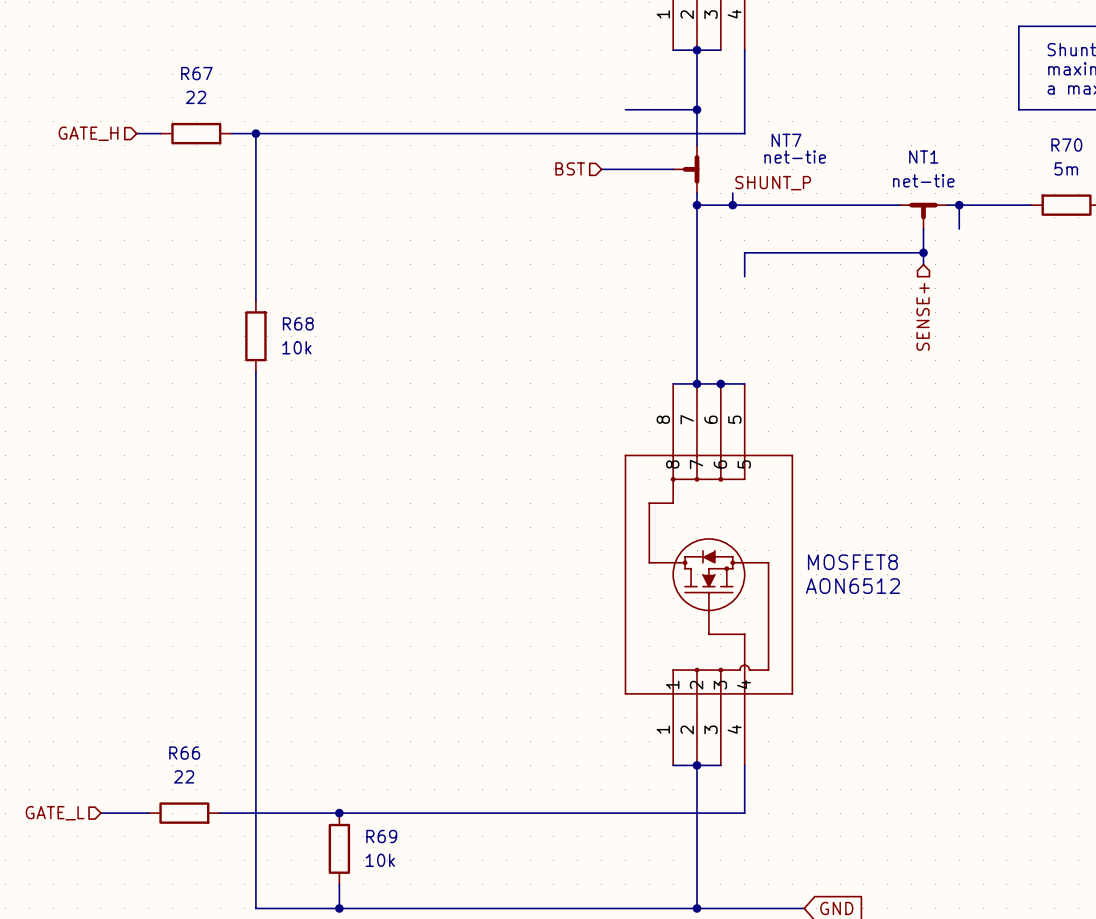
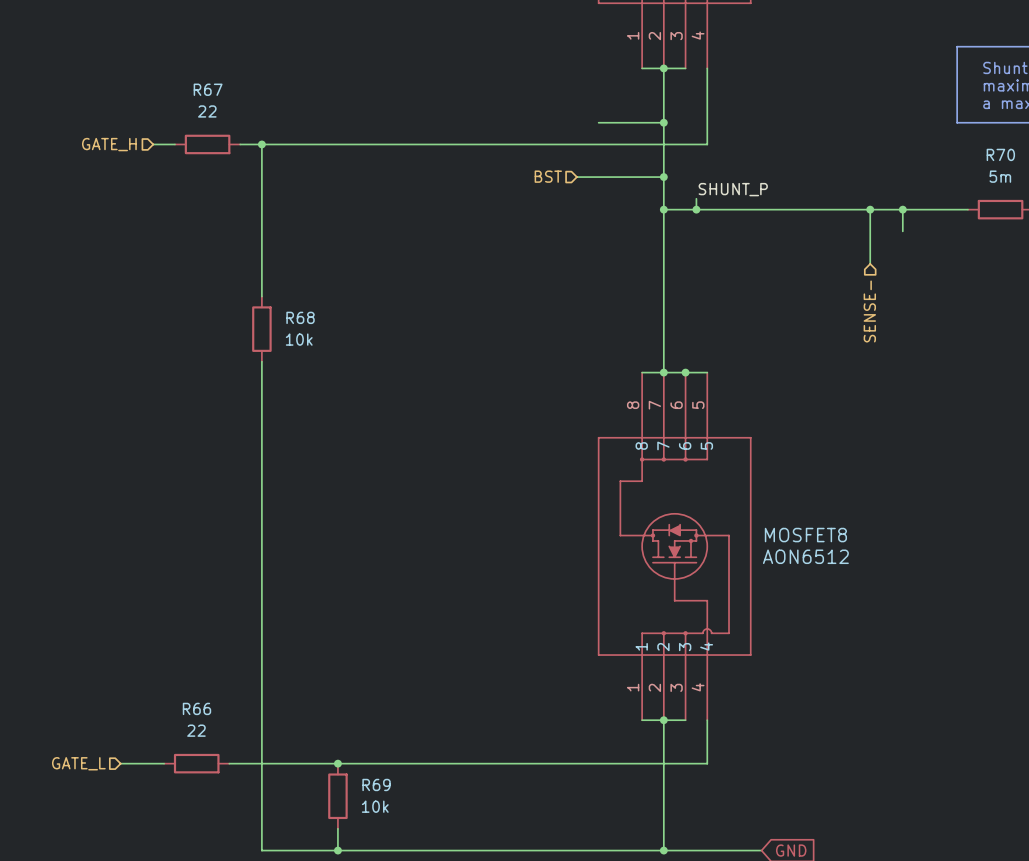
NT7: net-tie (685, 169) -> none
junction: none -> (663, 177)
NT1: net-tie (923, 216) -> none
wire: (923, 252) (744, 252) (744, 276) -> none
junction position: (923, 252) -> (870, 209)
hierarchical label: SENSE+ (923, 316) -> SENSE- (869, 311)

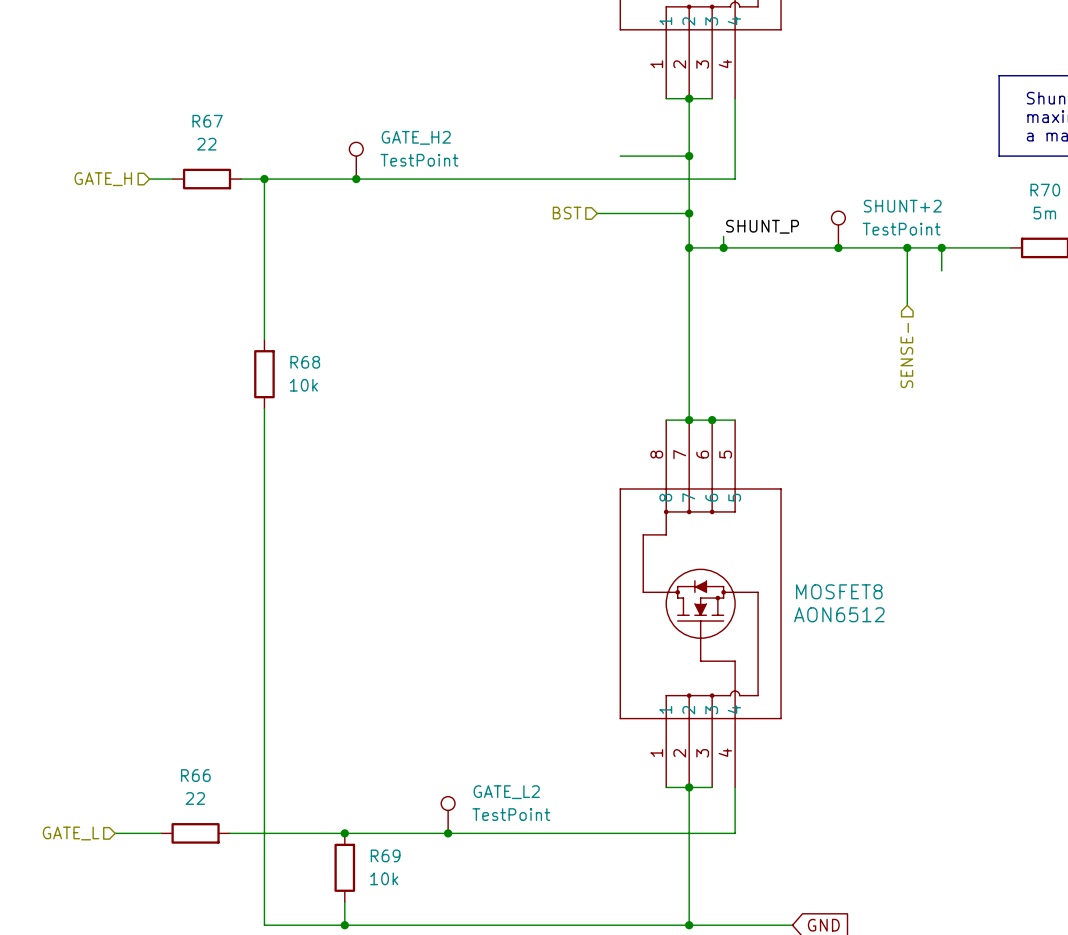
GATE_H2: none -> TestPoint (356, 160)
junction: none -> (356, 179)
SHUNT+2: none -> TestPoint (838, 229)
junction: none -> (838, 247)
GATE_L2: none -> TestPoint (448, 815)
junction: none -> (448, 833)

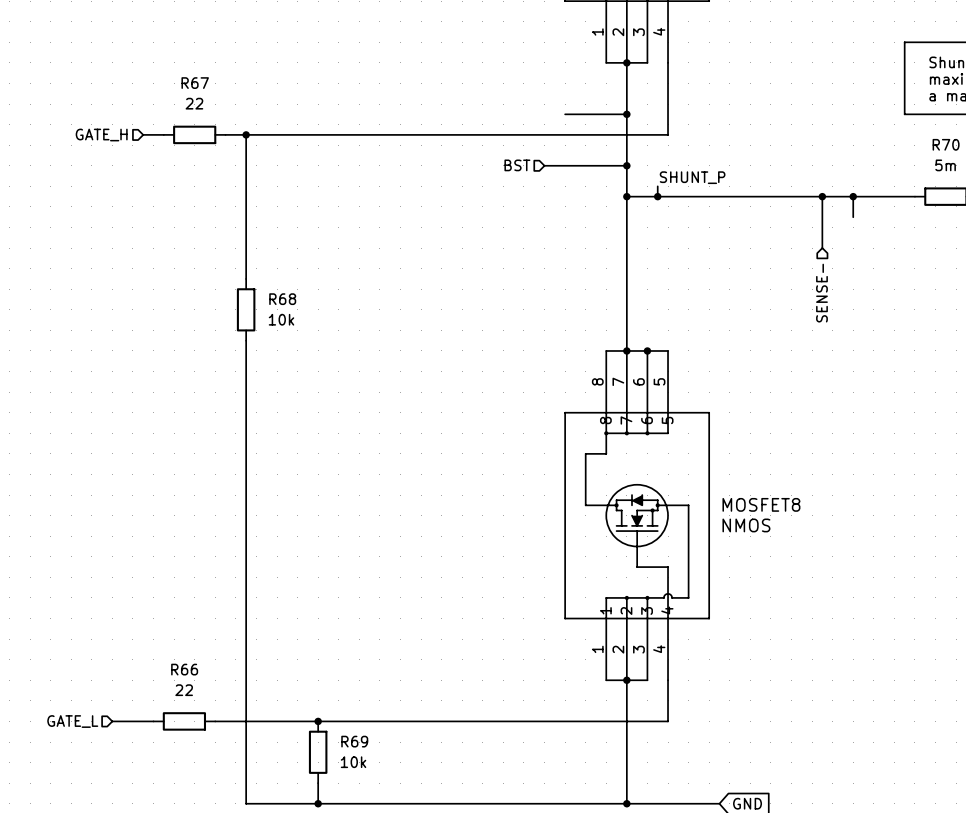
GATE_H2: TestPoint (356, 160) -> none
junction: (356, 179) -> none
SHUNT+2: TestPoint (838, 229) -> none
junction: (838, 247) -> none
MOSFET8 value: AON6512 (839, 614) -> NMOS (746, 525)
GATE_L2: TestPoint (448, 815) -> none
junction: (448, 833) -> none

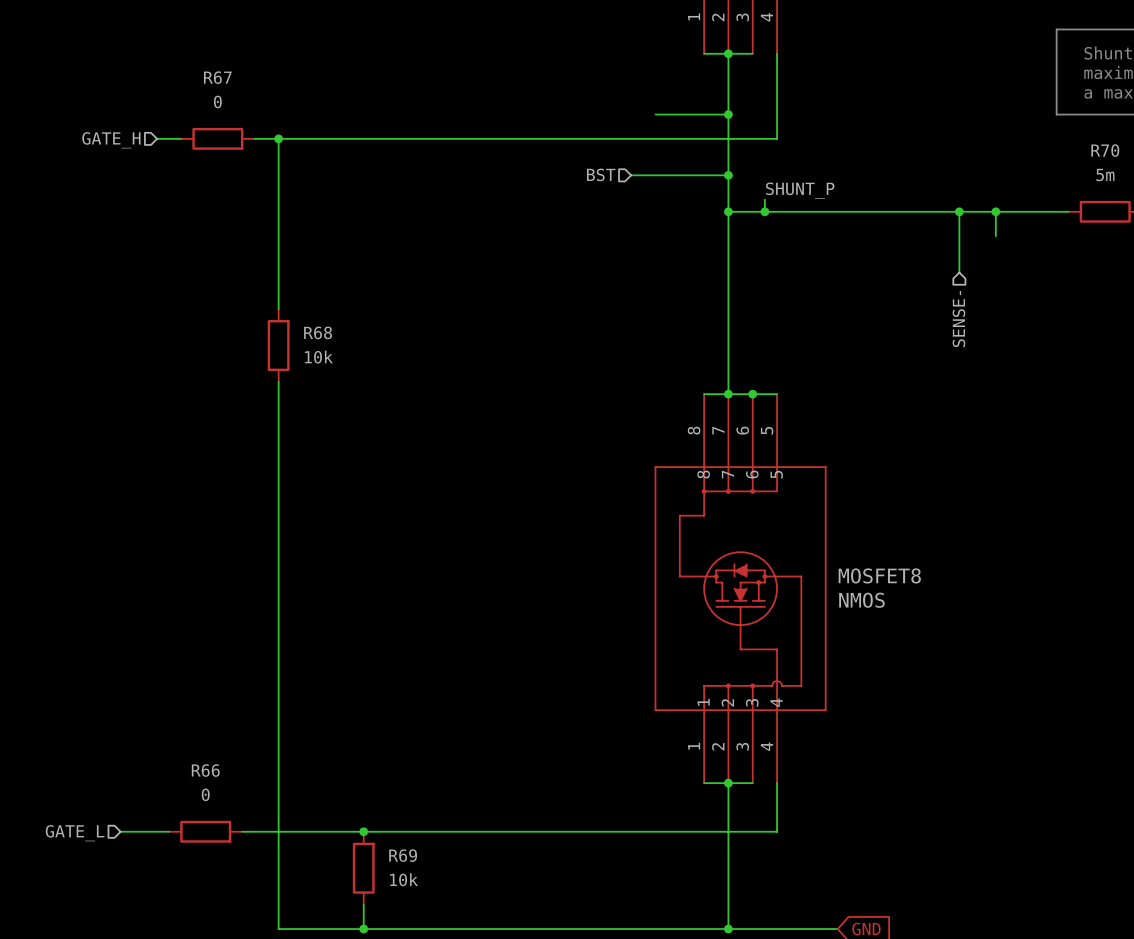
R67 value: 22 (194, 103) -> 0 (217, 101)
R66 value: 22 (184, 690) -> 0 (205, 794)

